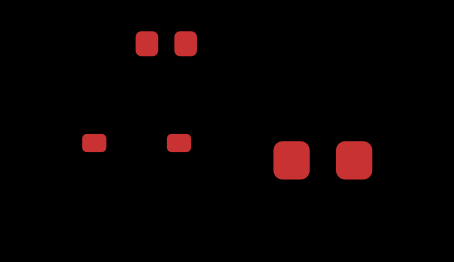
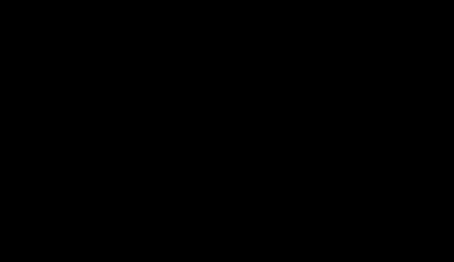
part: (166, 43) -> none
part: (136, 143) -> none
part: (322, 160) -> none

